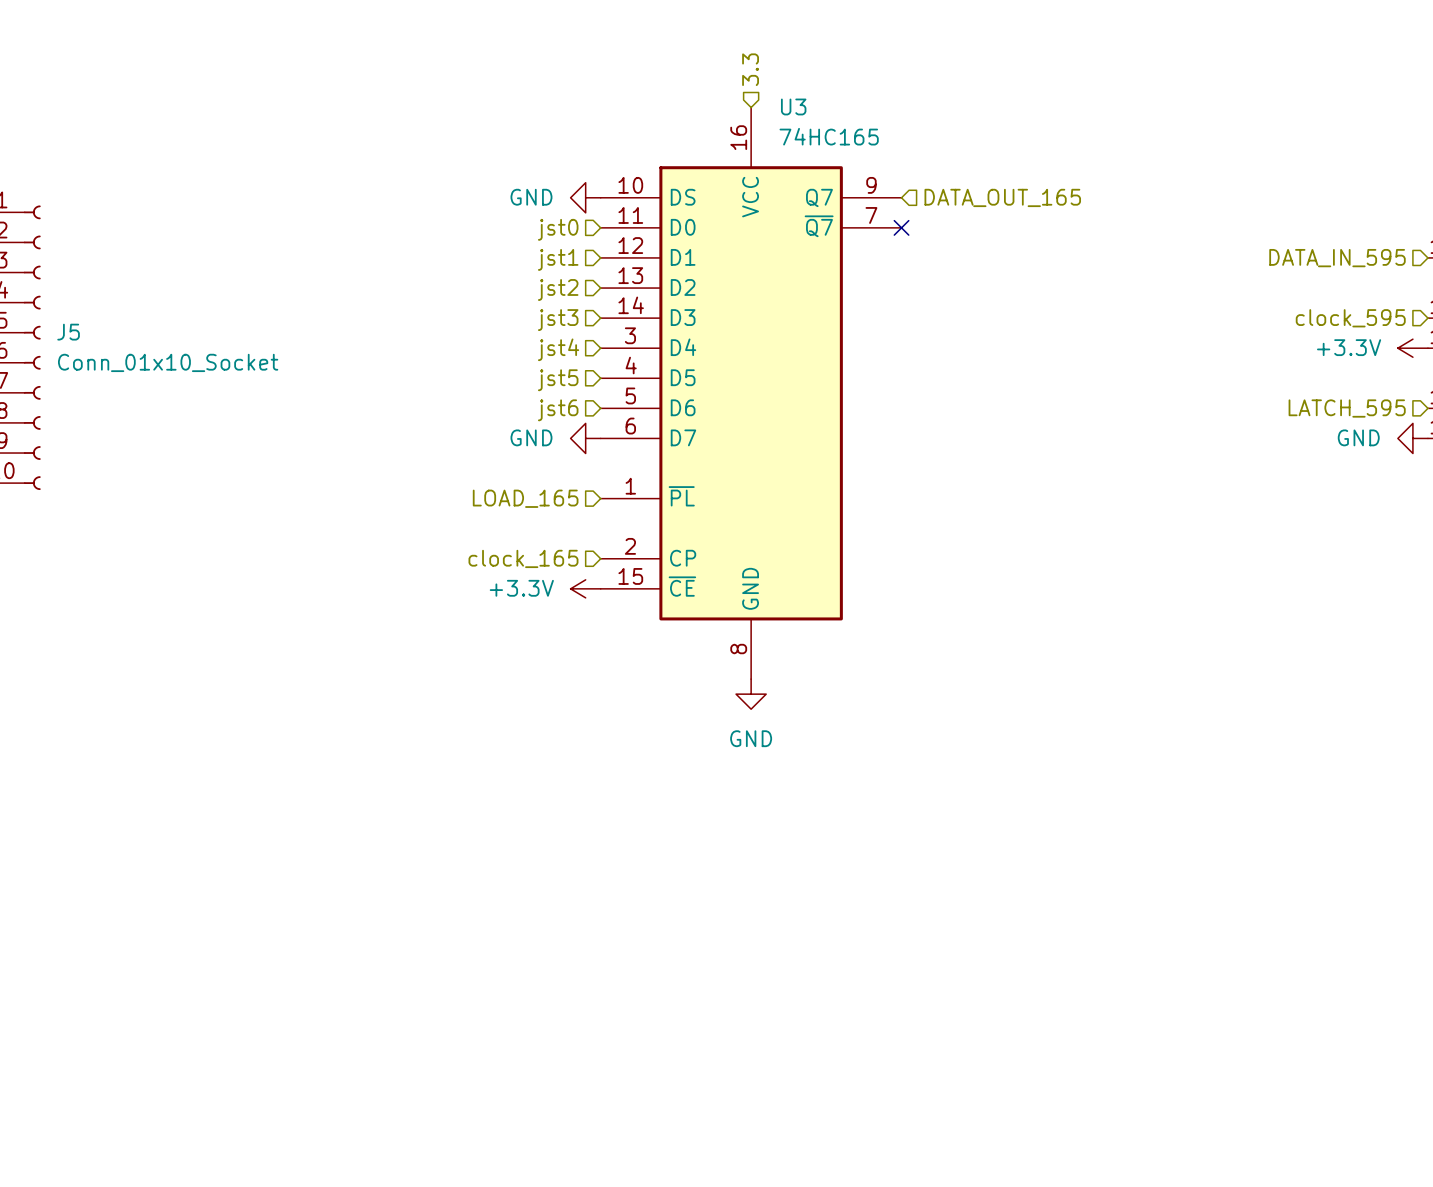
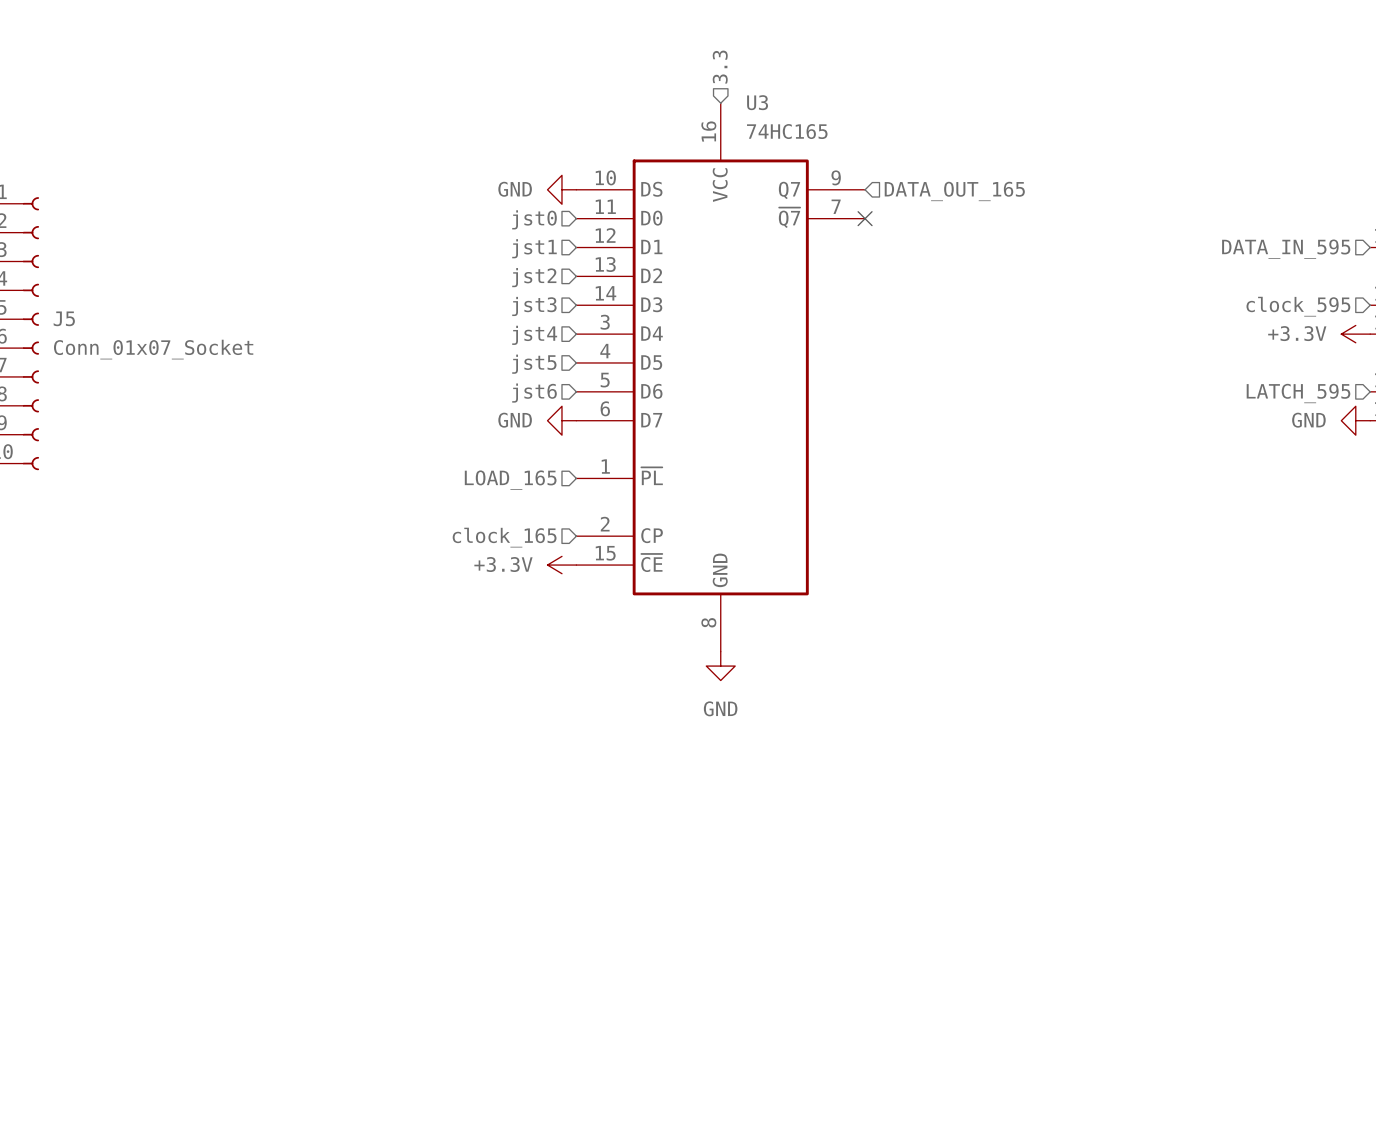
J5 value: Conn_01x10_Socket (168, 362) -> Conn_01x07_Socket (153, 349)

